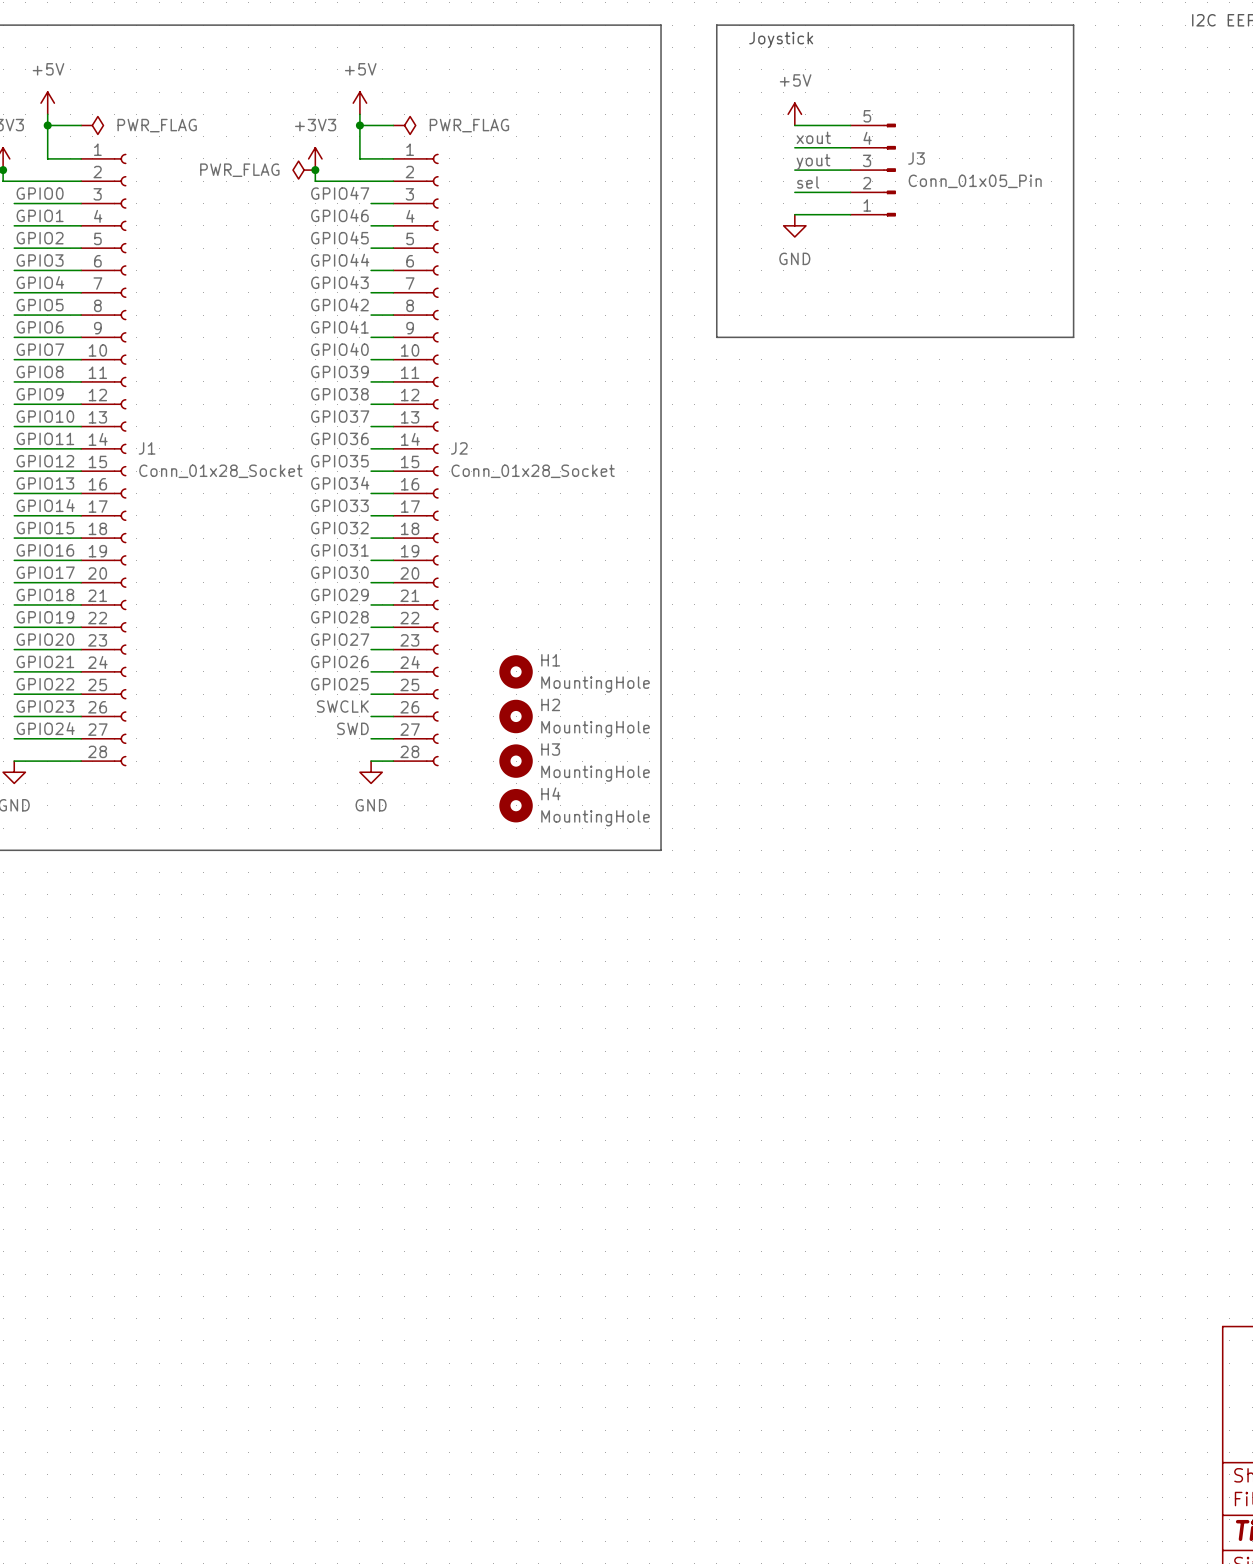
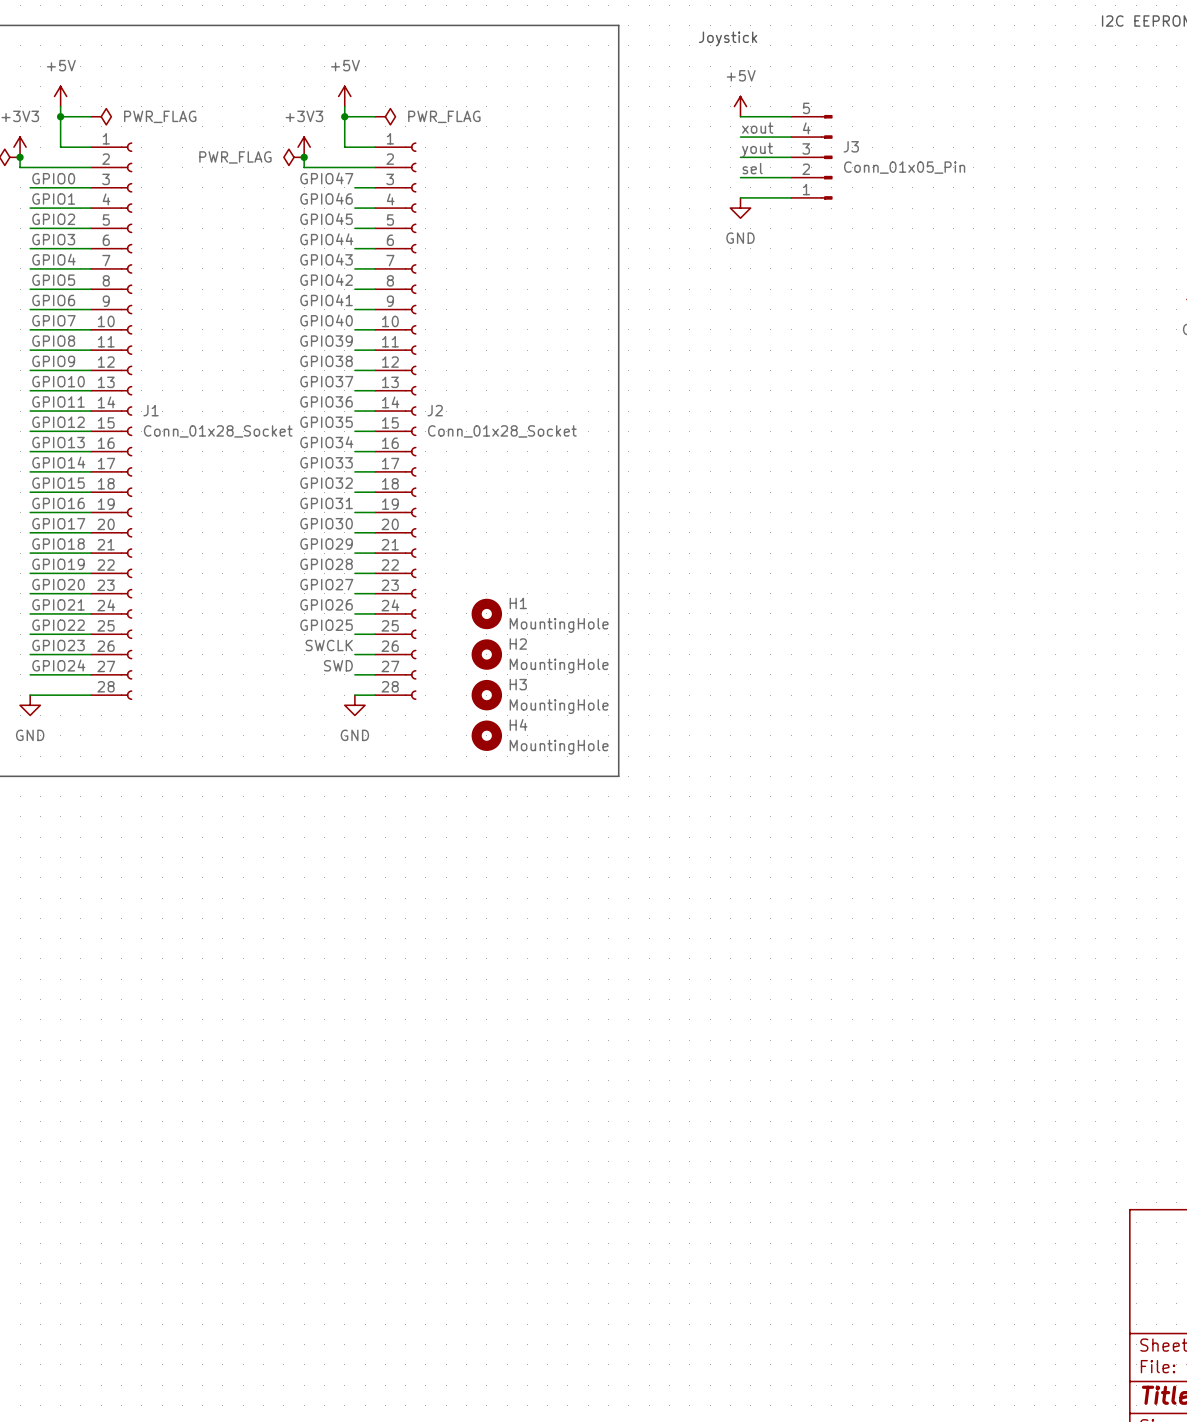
line: (716, 25) (1073, 25) (1073, 337) (716, 337) (716, 25) -> none

